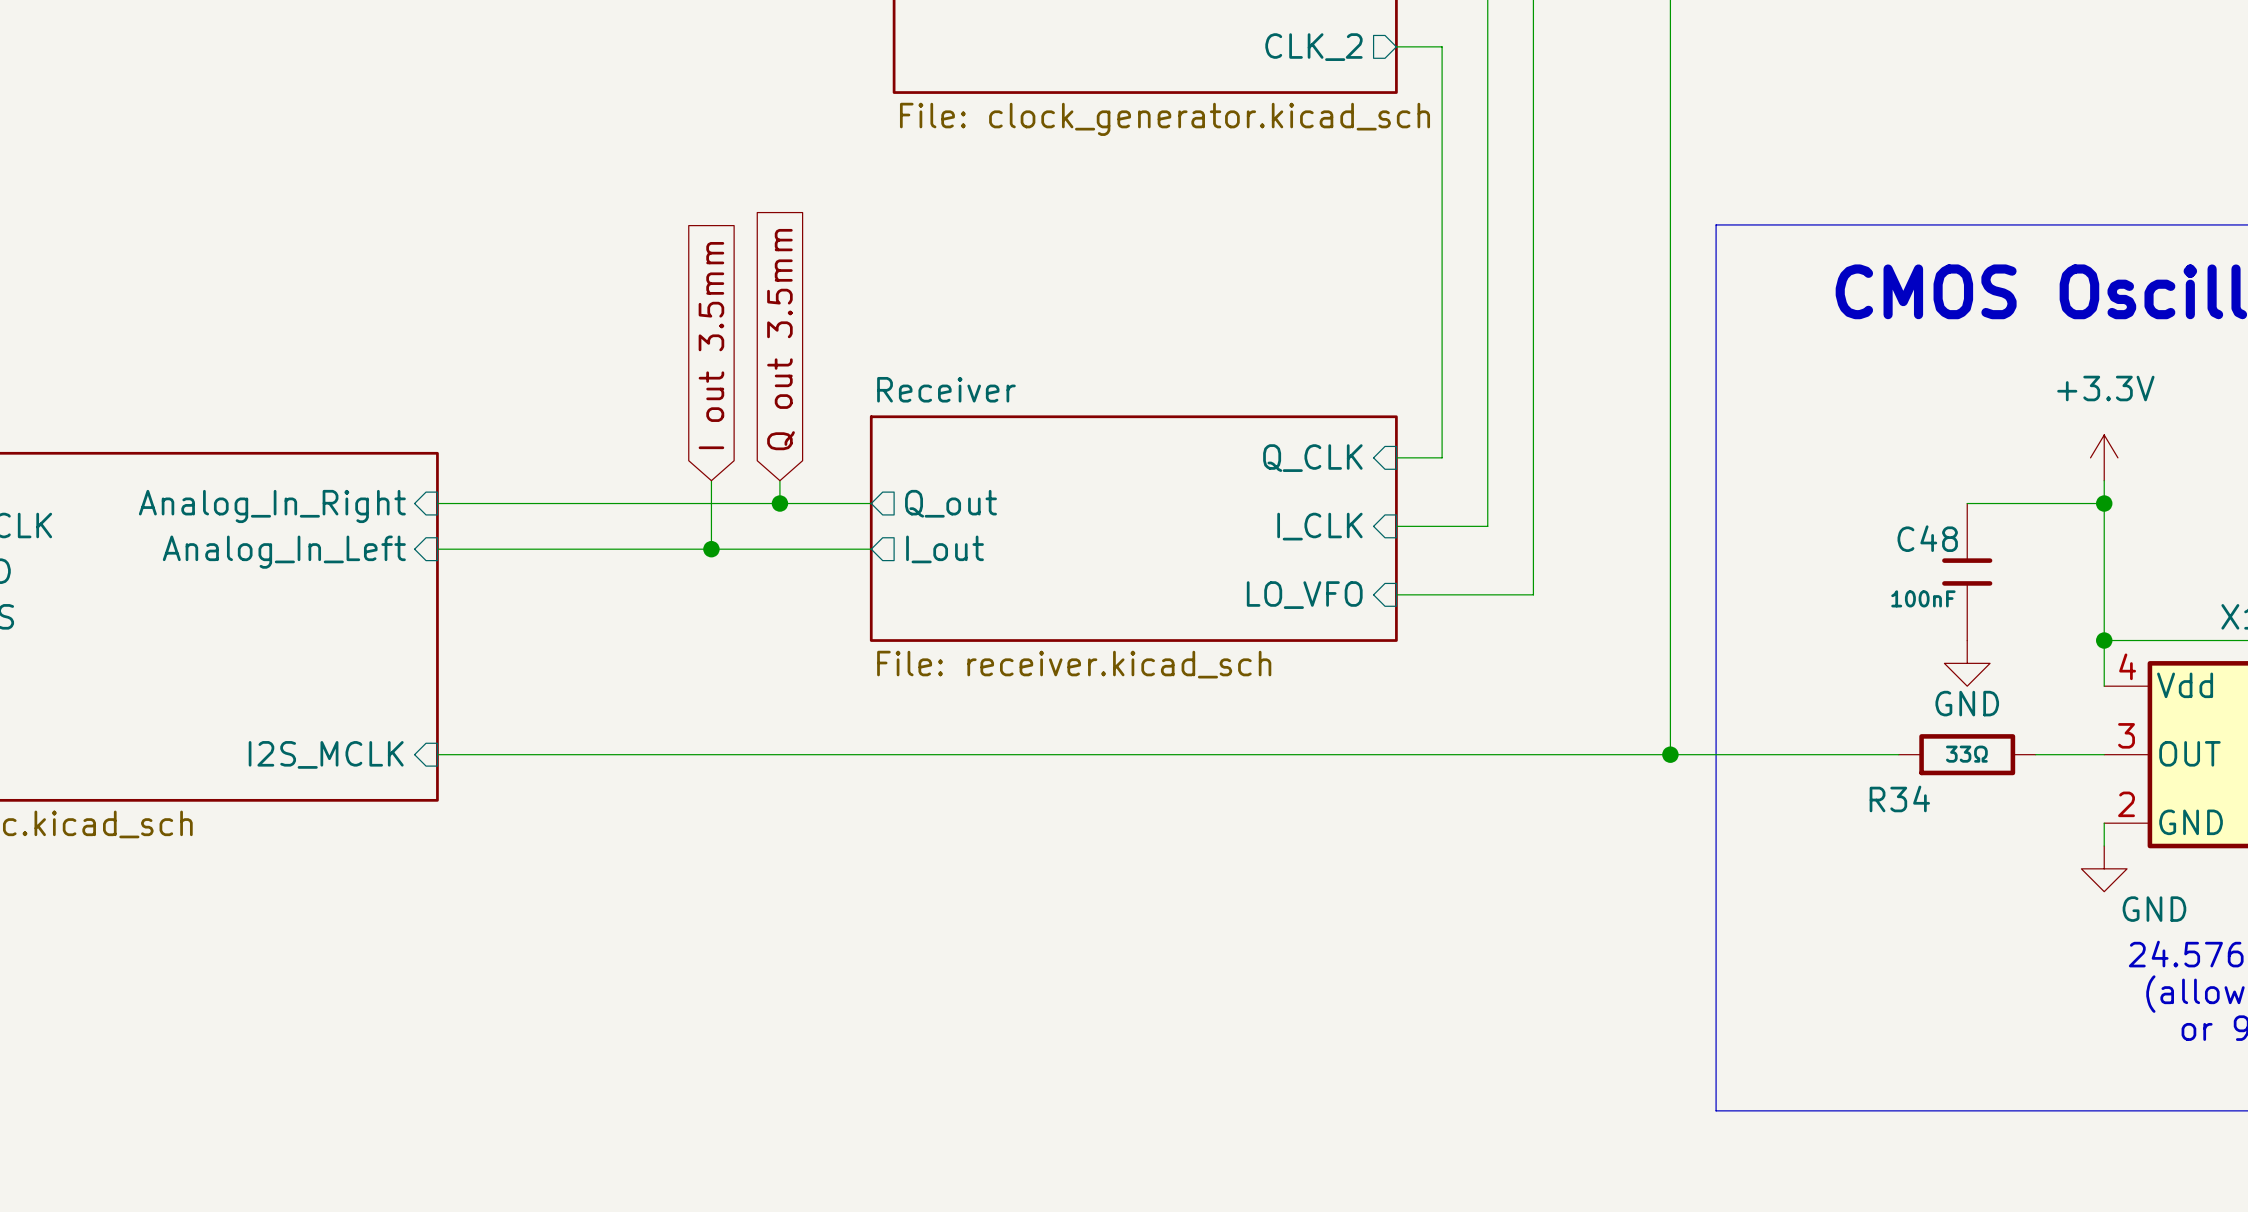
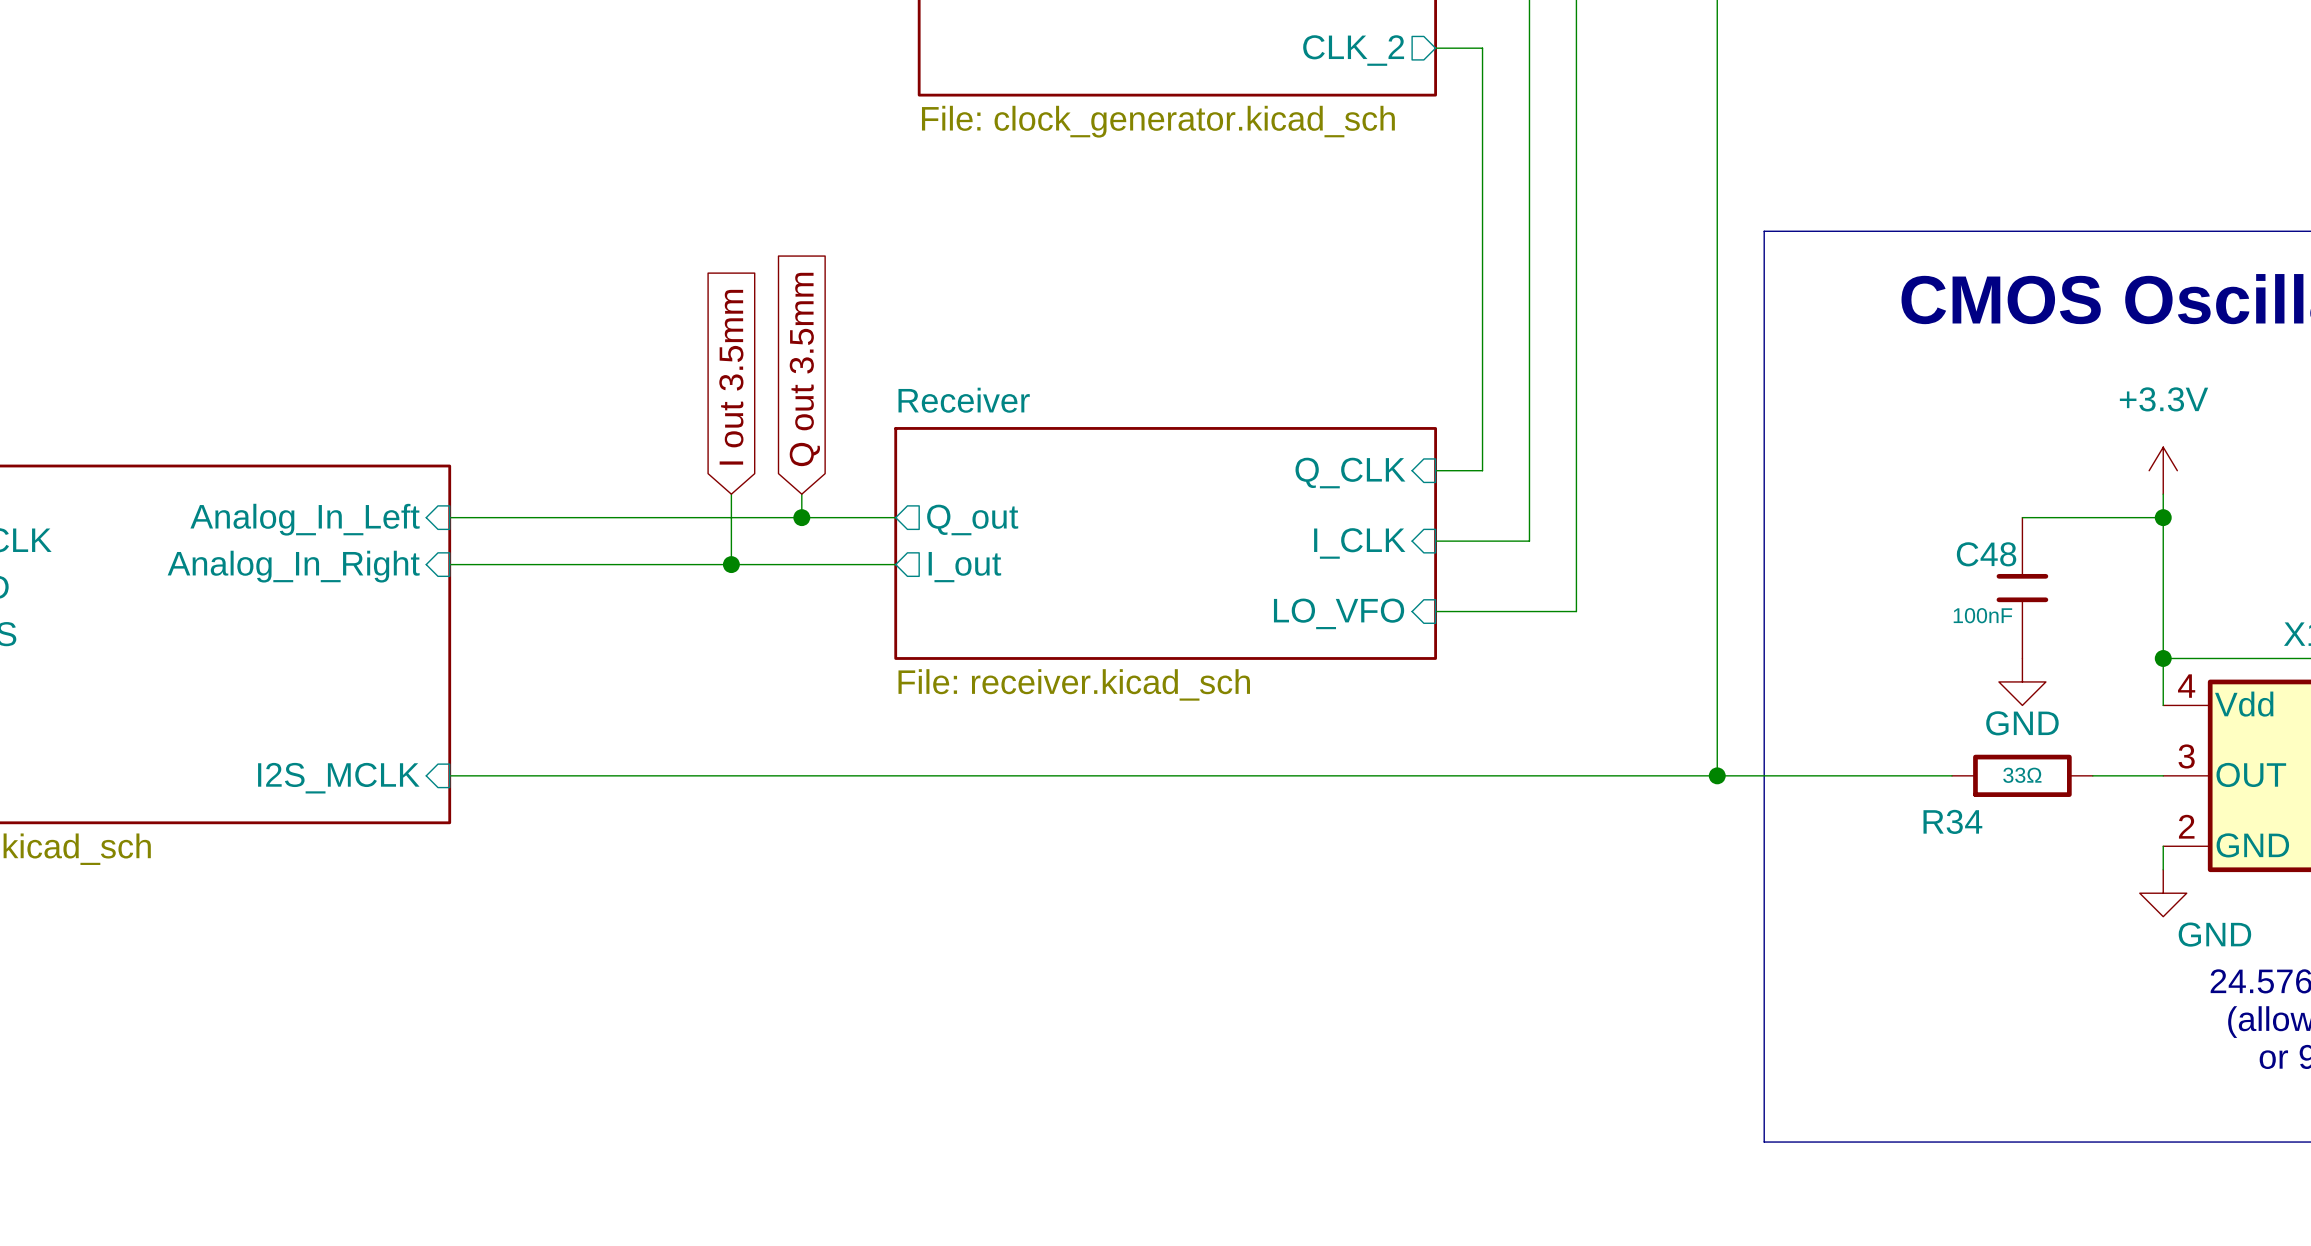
sheet pin: Analog_In_Right (272, 506) -> Analog_In_Left (305, 519)
sheet pin: Analog_In_Left (284, 552) -> Analog_In_Right (293, 566)

